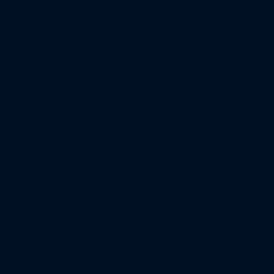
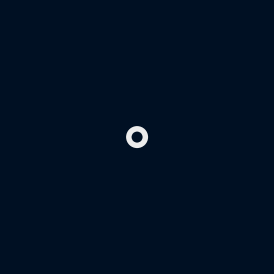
via: none -> (137, 137)

